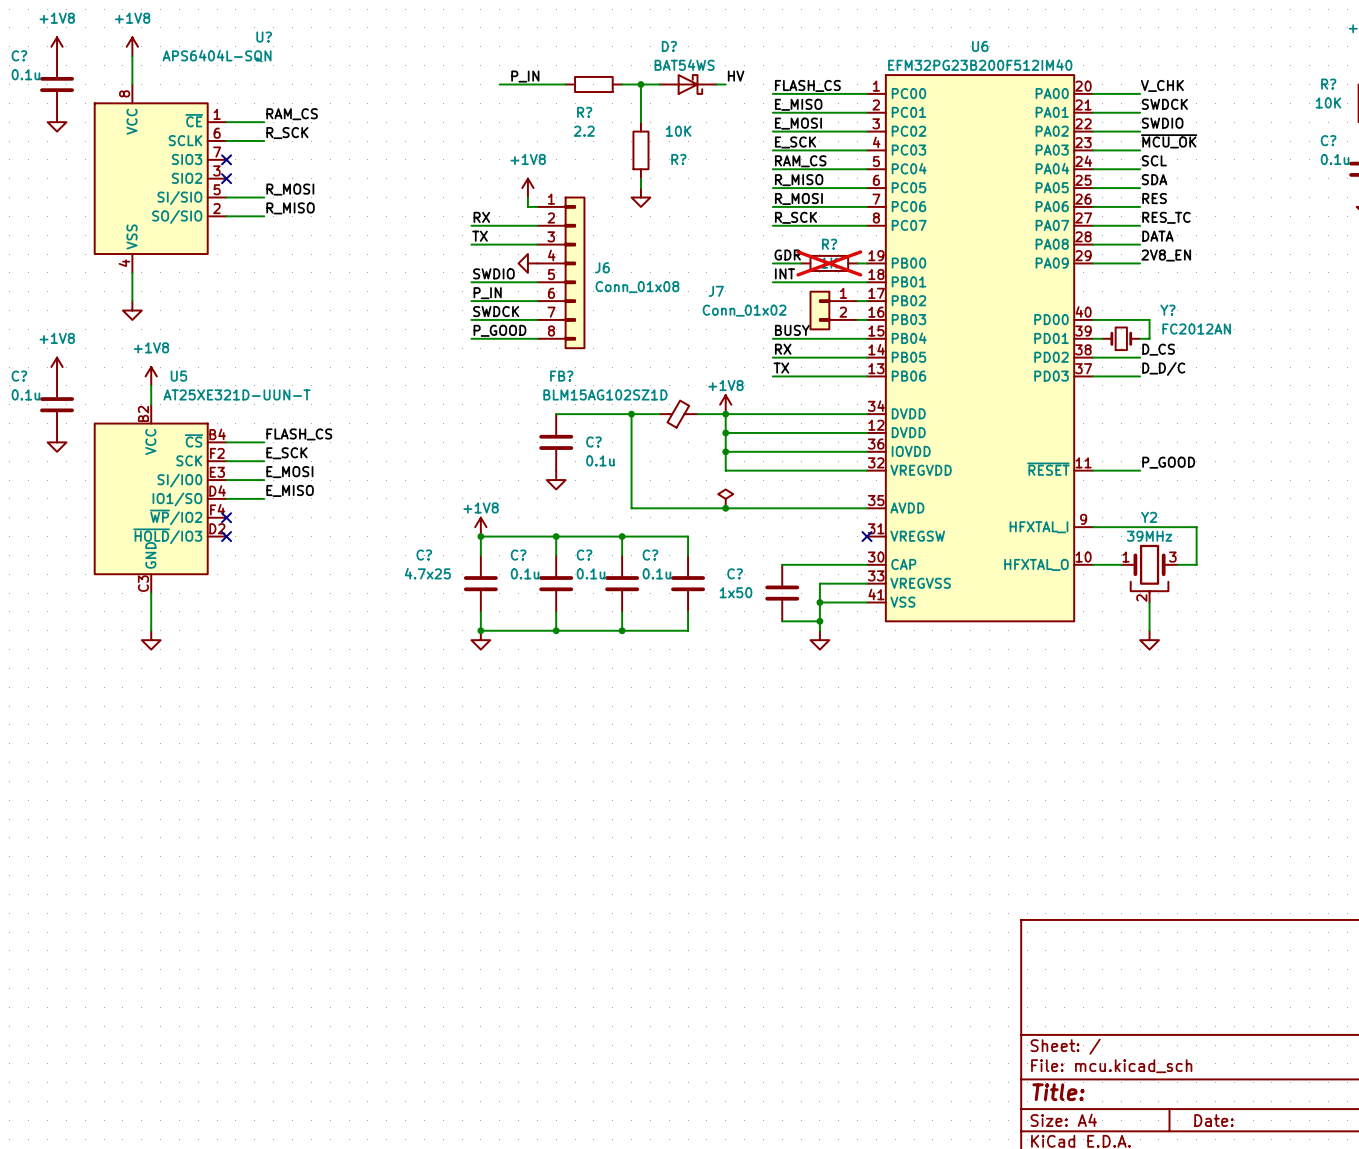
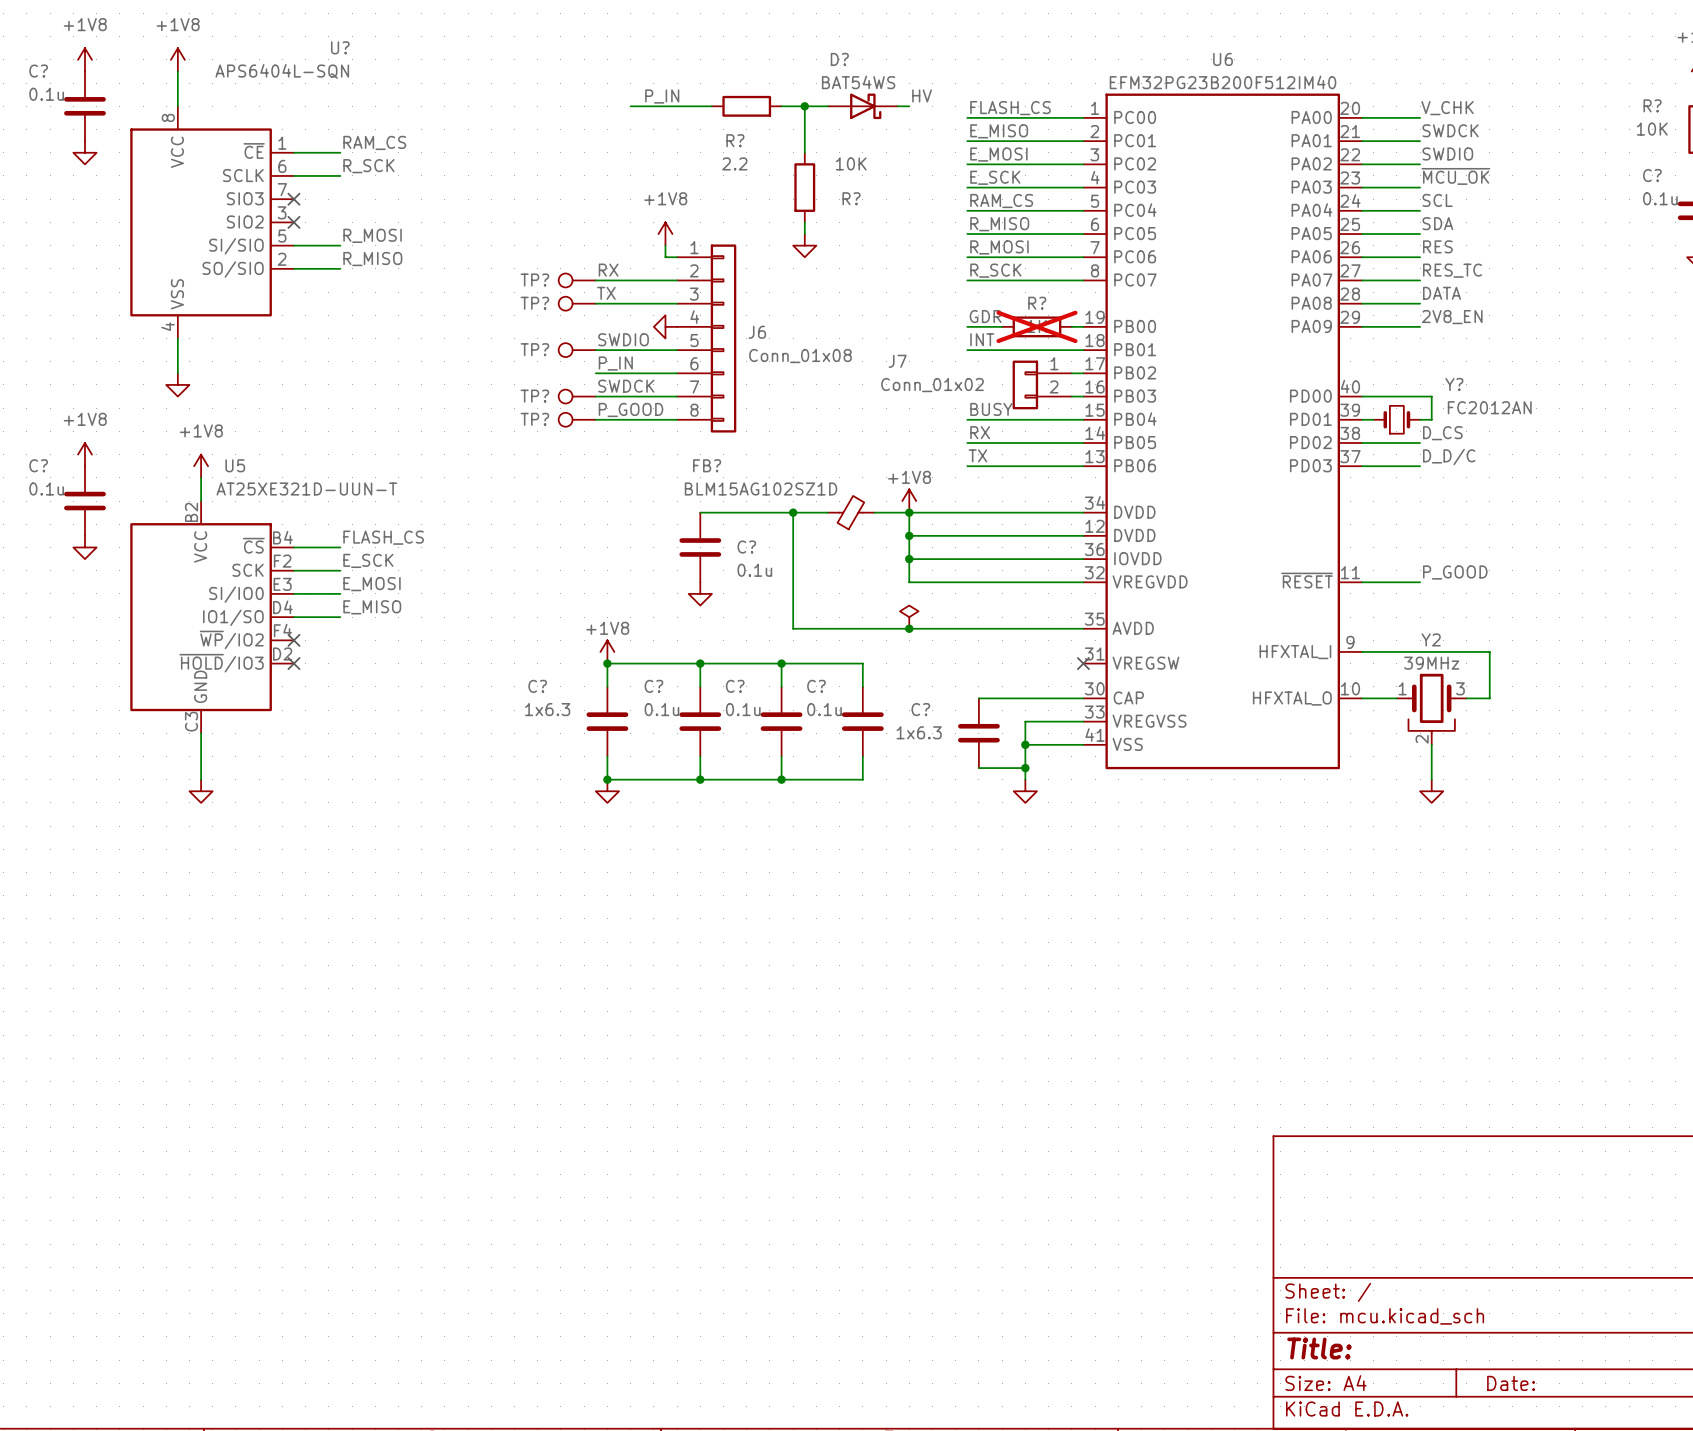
TP?: none -> (577, 280)
TP?: none -> (577, 303)
TP?: none -> (577, 350)
TP?: none -> (577, 396)
TP?: none -> (577, 419)
C? value: 4.7x25 (427, 573) -> 1x6.3 (547, 709)
C? value: 1x50 (735, 592) -> 1x6.3 (919, 732)

